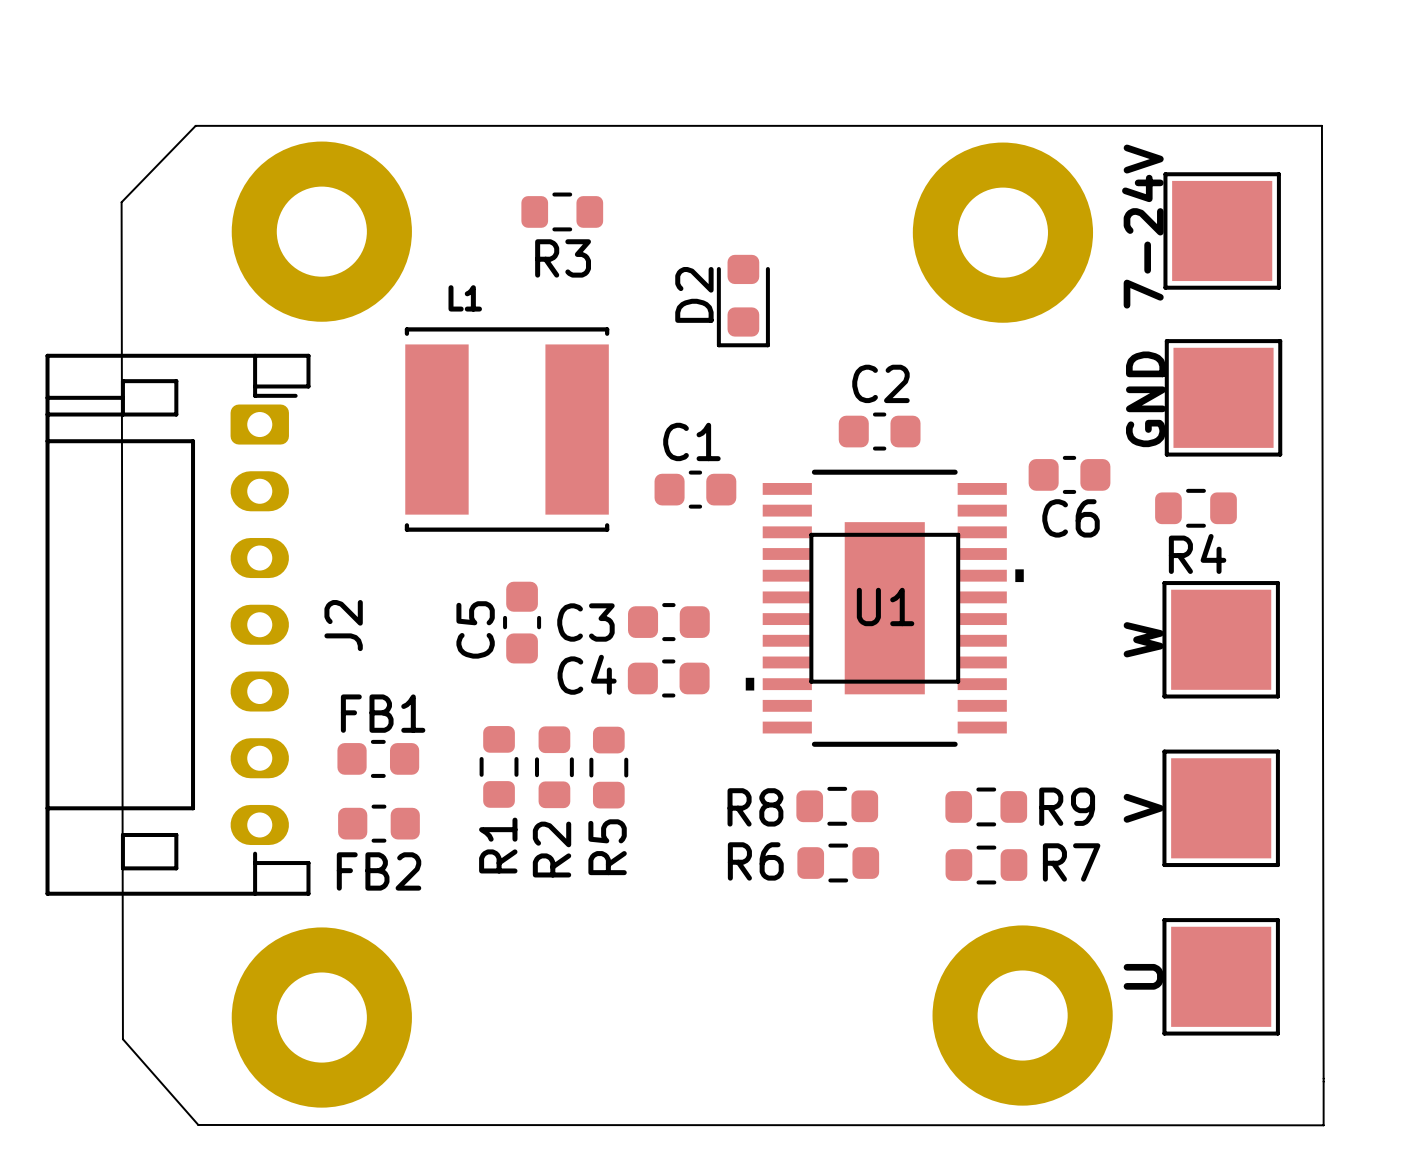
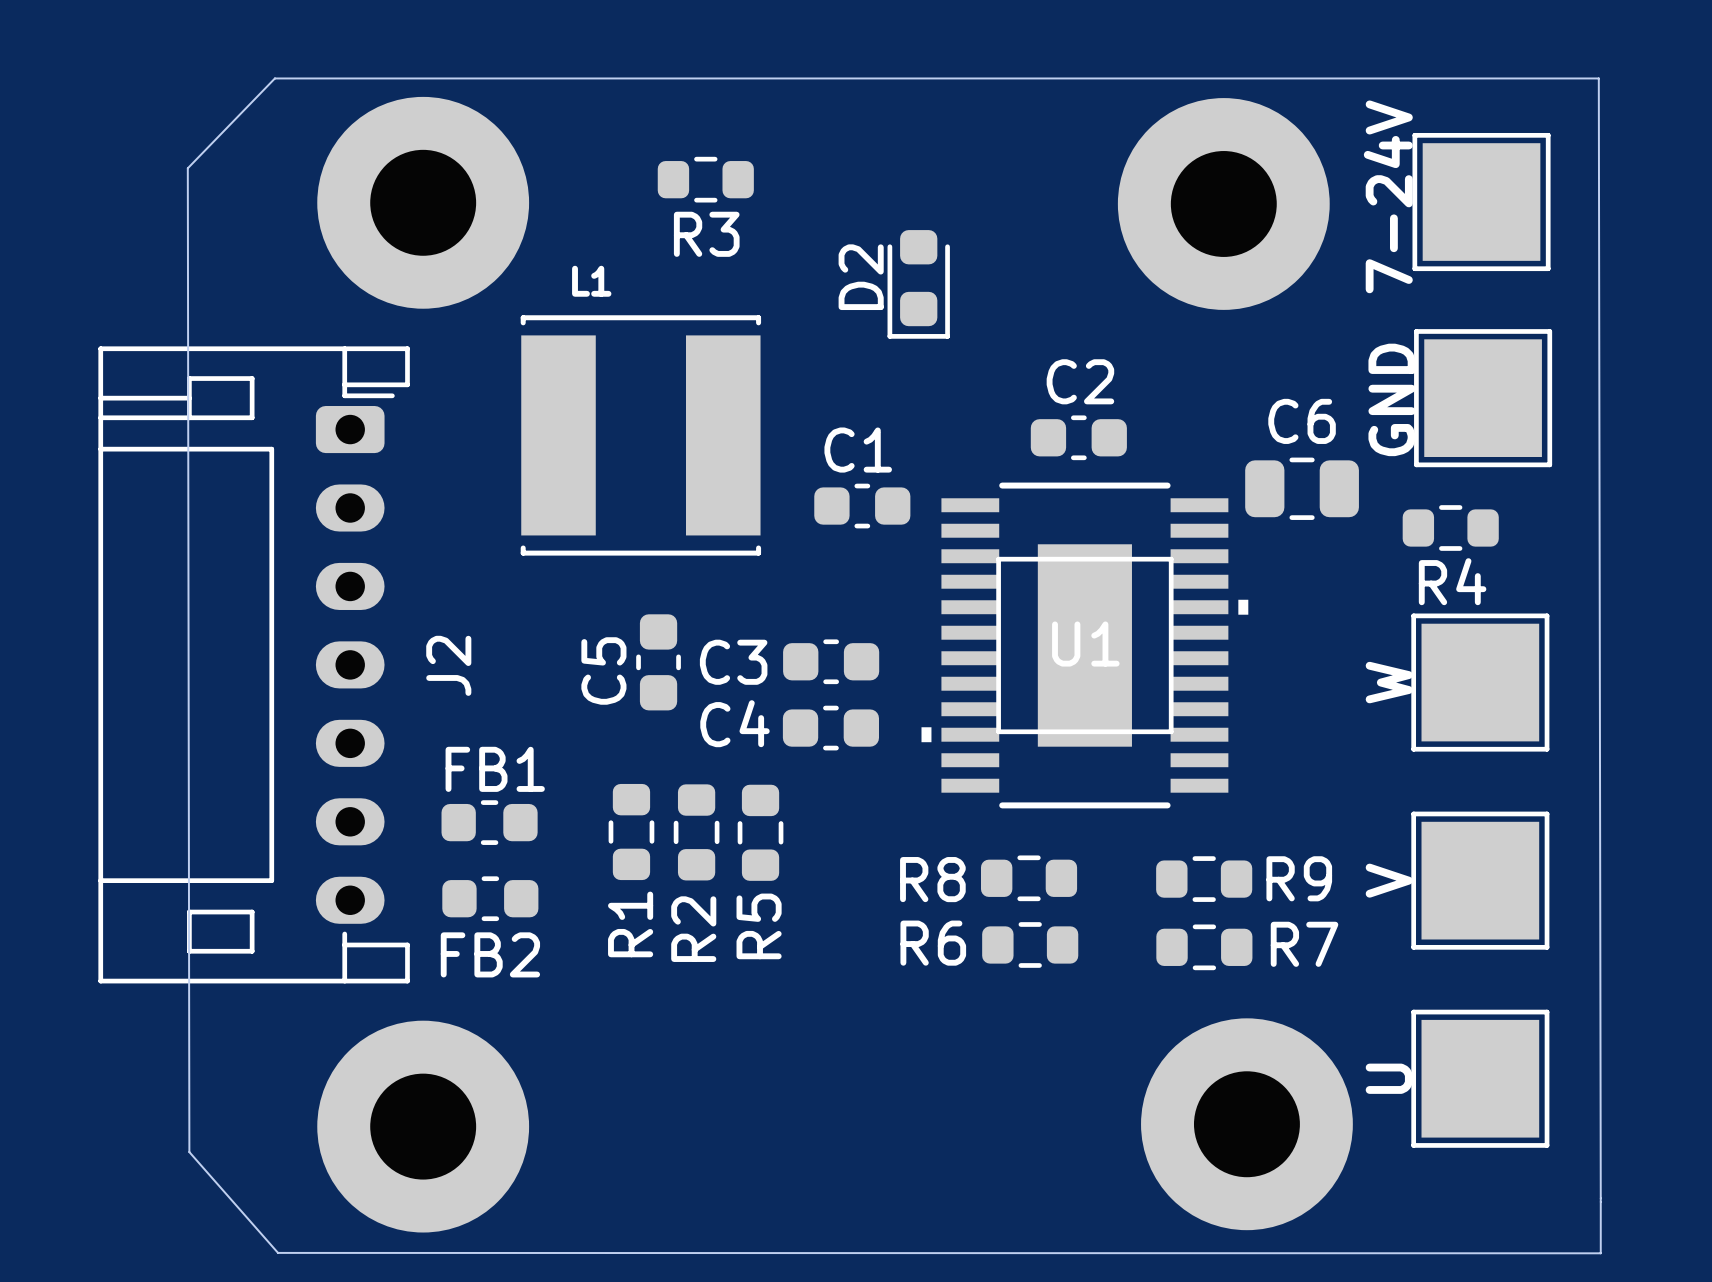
C6 footprint: [1028, 455, 1111, 494] -> [1245, 457, 1359, 520]
C6 name position: C6 (1071, 518) -> C6 (1302, 421)

